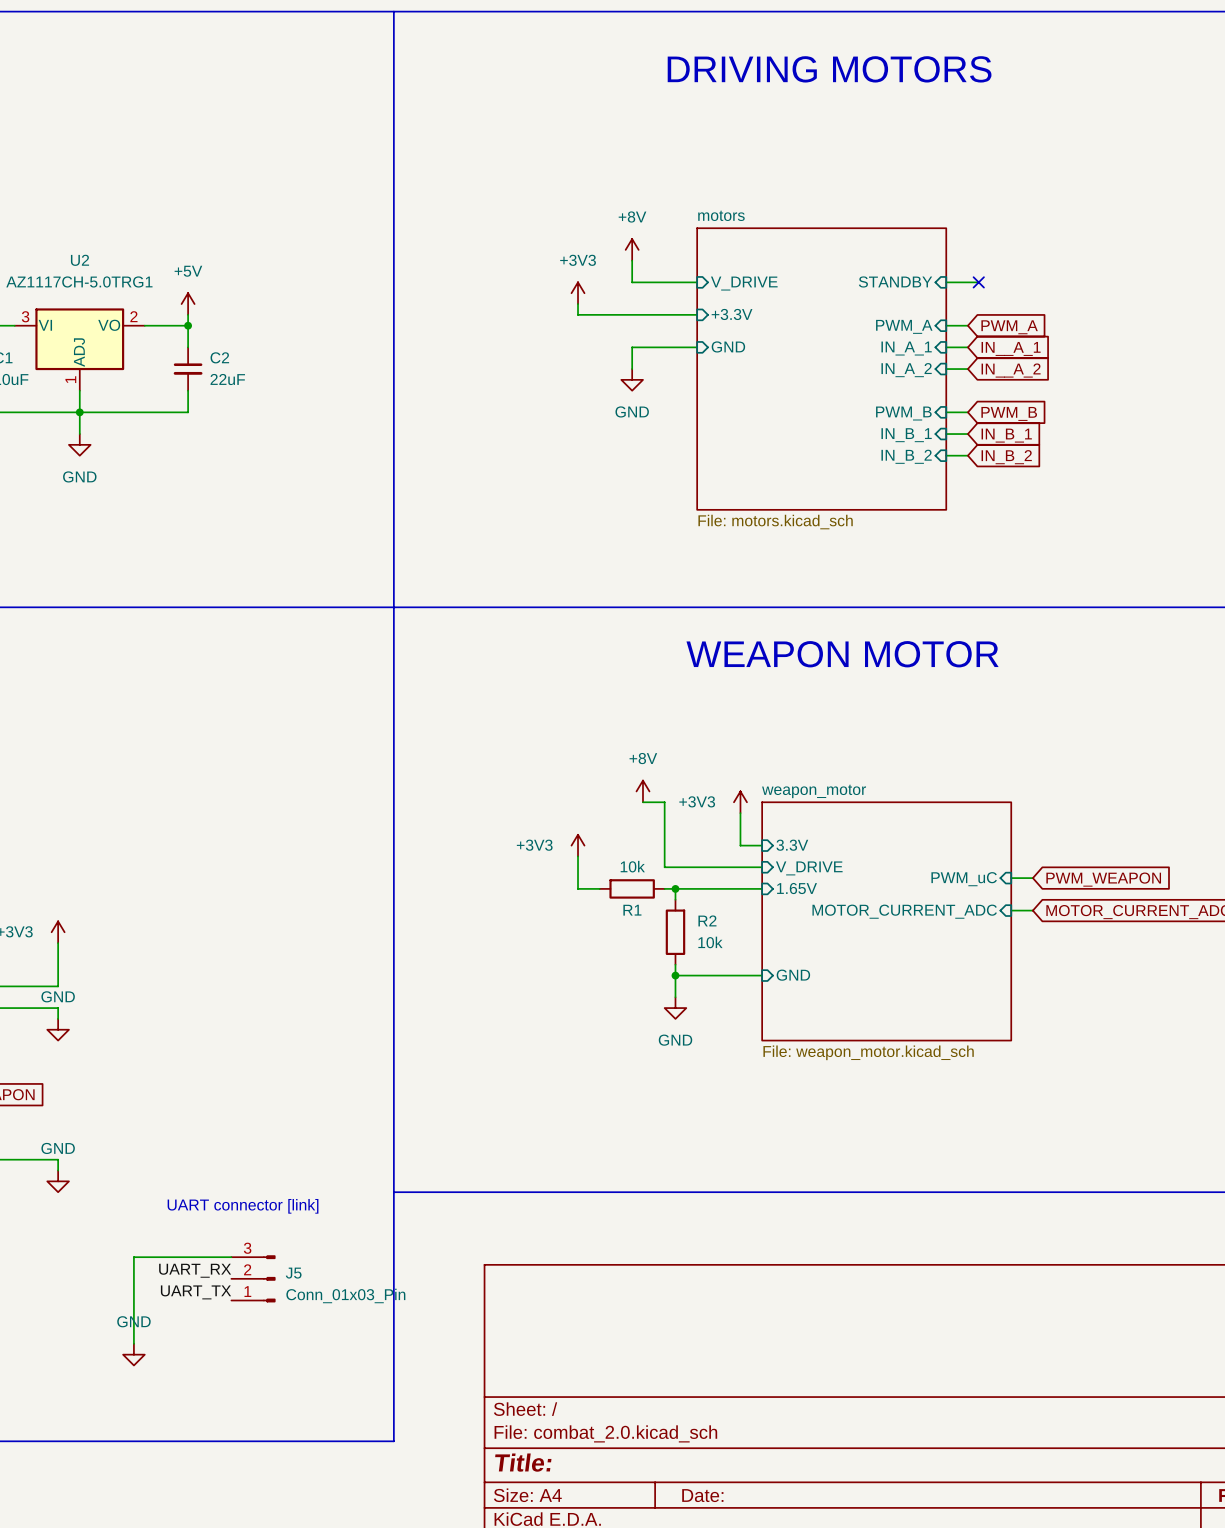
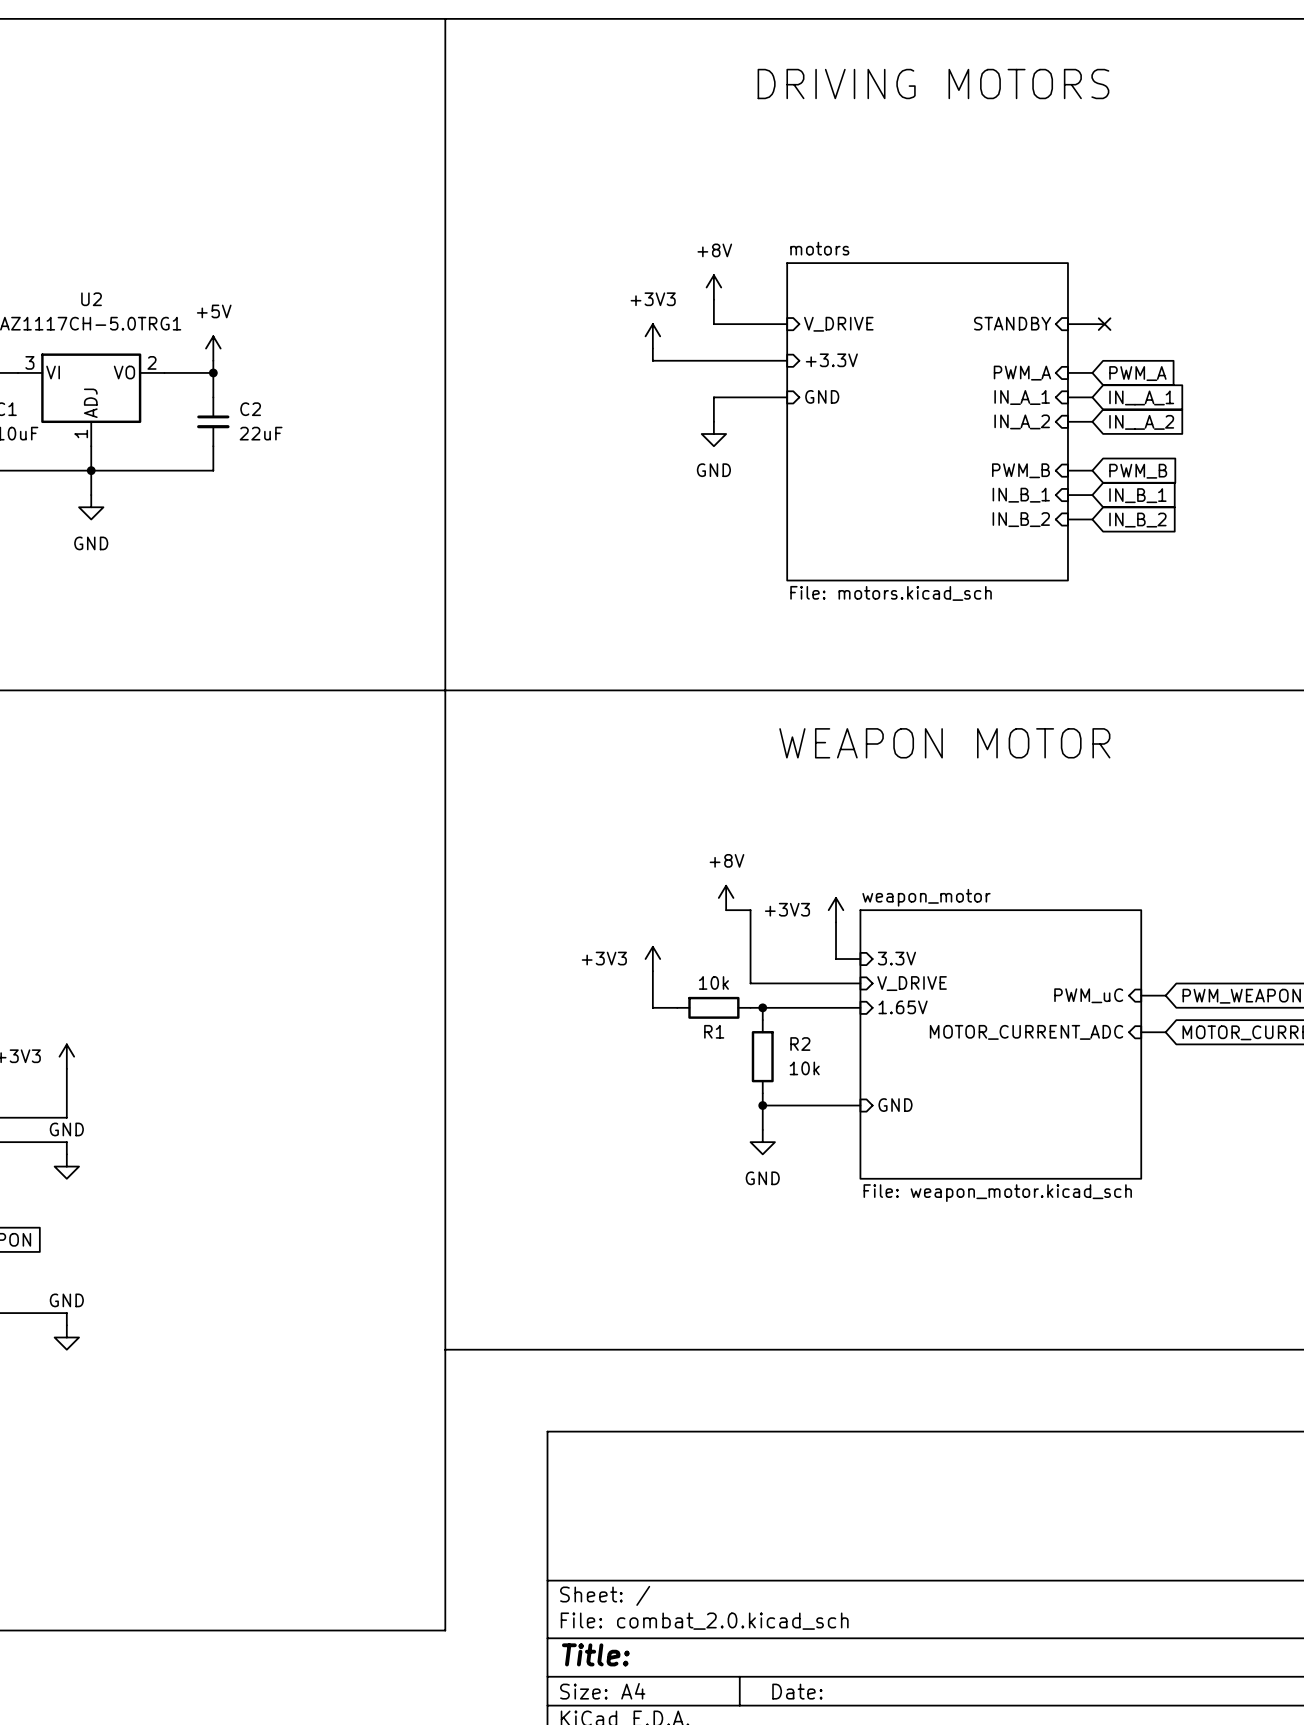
text: UART connector [link] (243, 1206) -> none
wire: (231, 1257) (133, 1257) (133, 1343) -> none
label: UART_RX (195, 1270) -> none
J5: Conn_01x03_Pin (253, 1278) -> none
label: UART_TX (195, 1292) -> none
power symbol: GND (133, 1354) -> none

